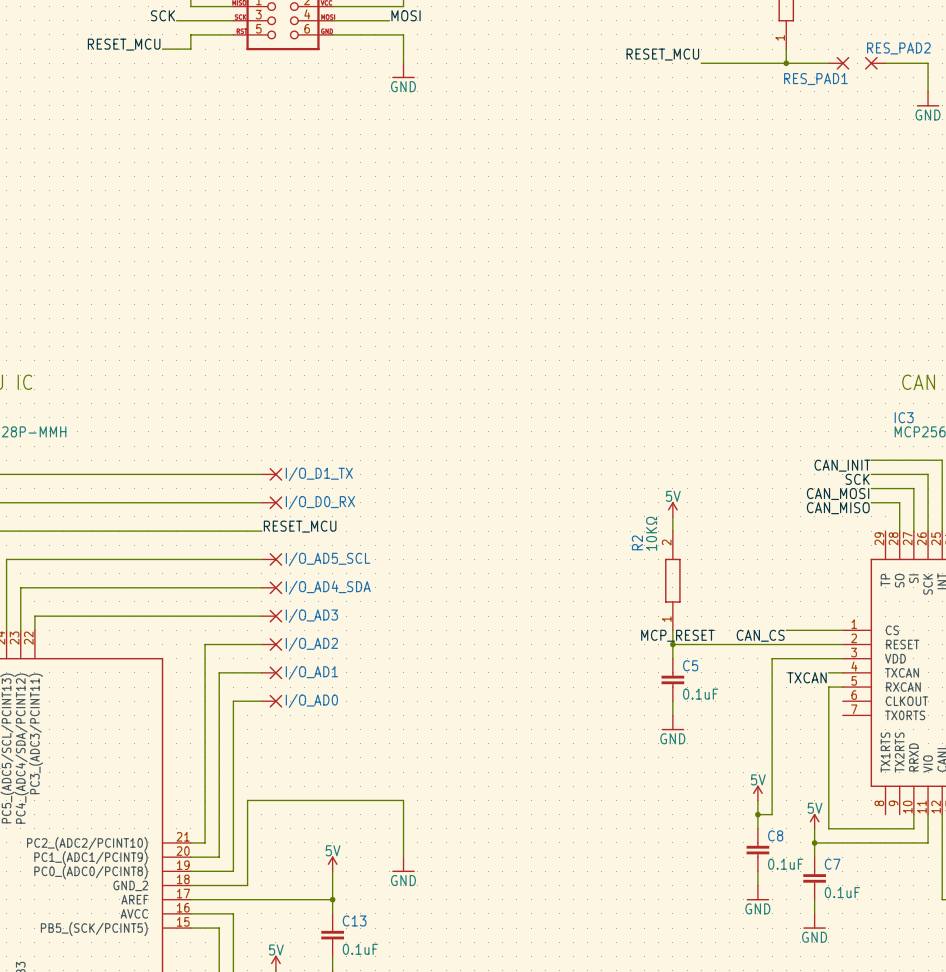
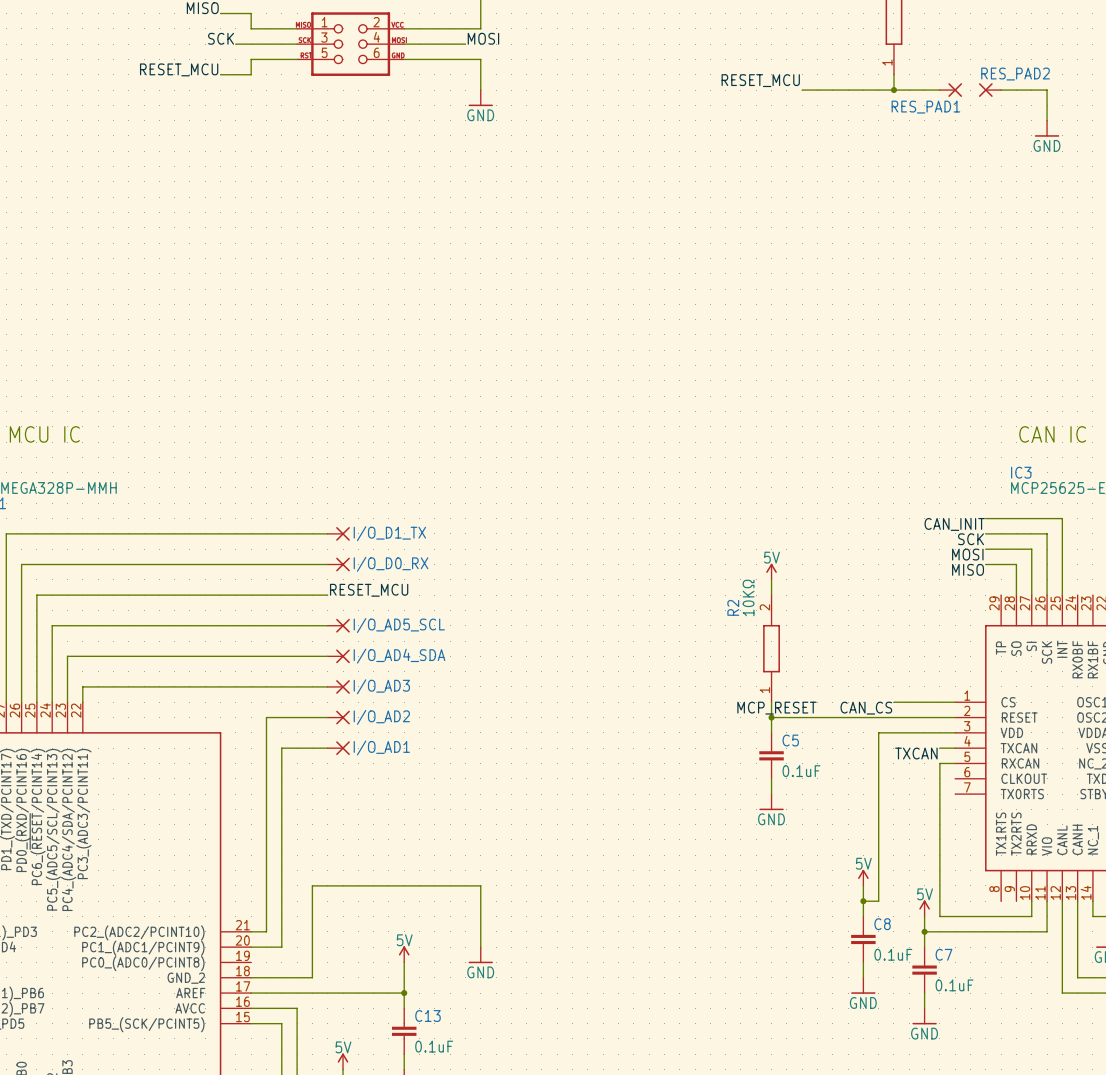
label: CAN_MOSI (838, 494) -> MOSI (967, 554)
label: CAN_MISO (838, 508) -> MISO (968, 569)
wire: (261, 701) (233, 701) (233, 871) (190, 871) -> none
I/O_AD0: (272, 701) -> none

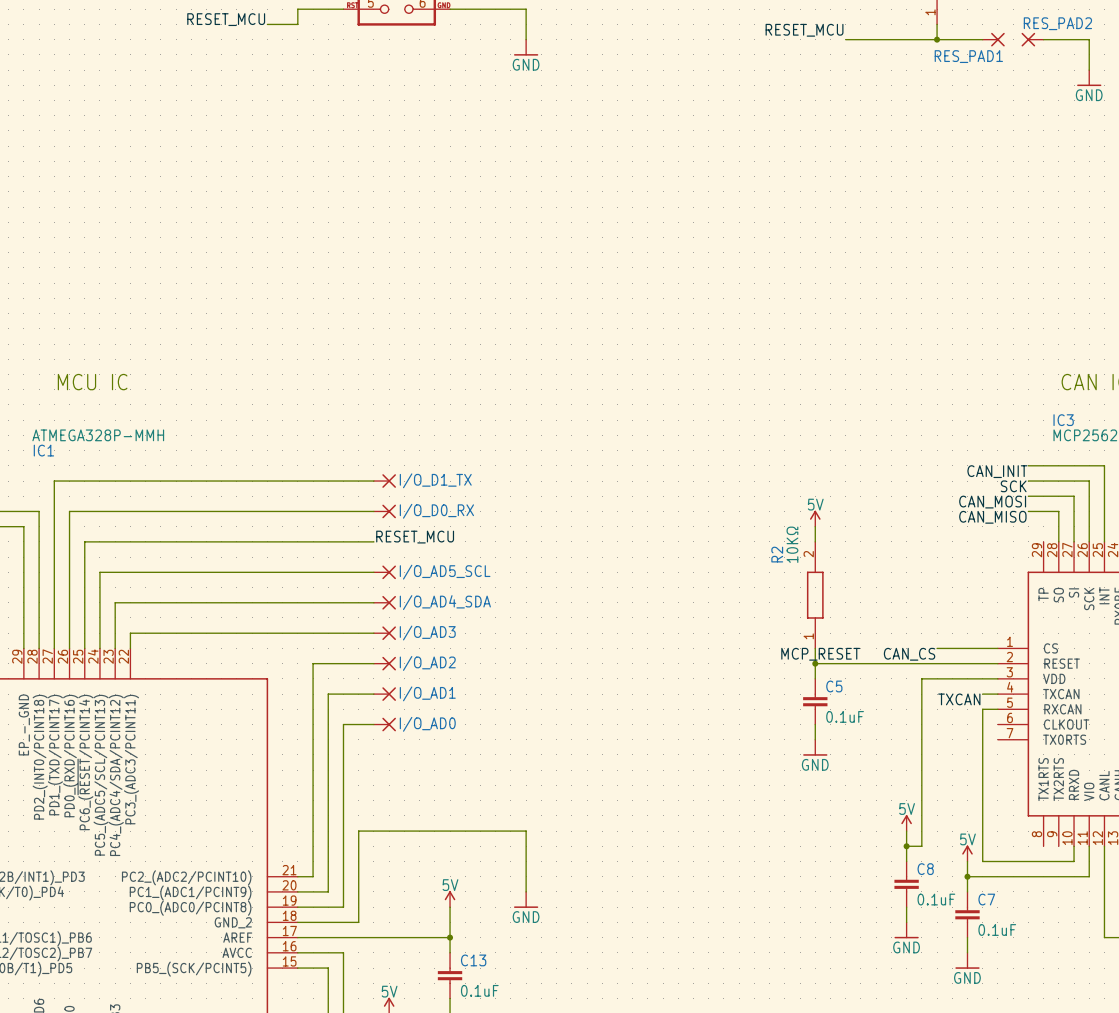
label: MOSI (967, 554) -> CAN_MOSI (992, 502)
label: MISO (968, 569) -> CAN_MISO (992, 517)
wire: none -> (373, 724) (343, 724) (343, 907) (297, 907)
I/O_AD0: none -> (384, 724)

